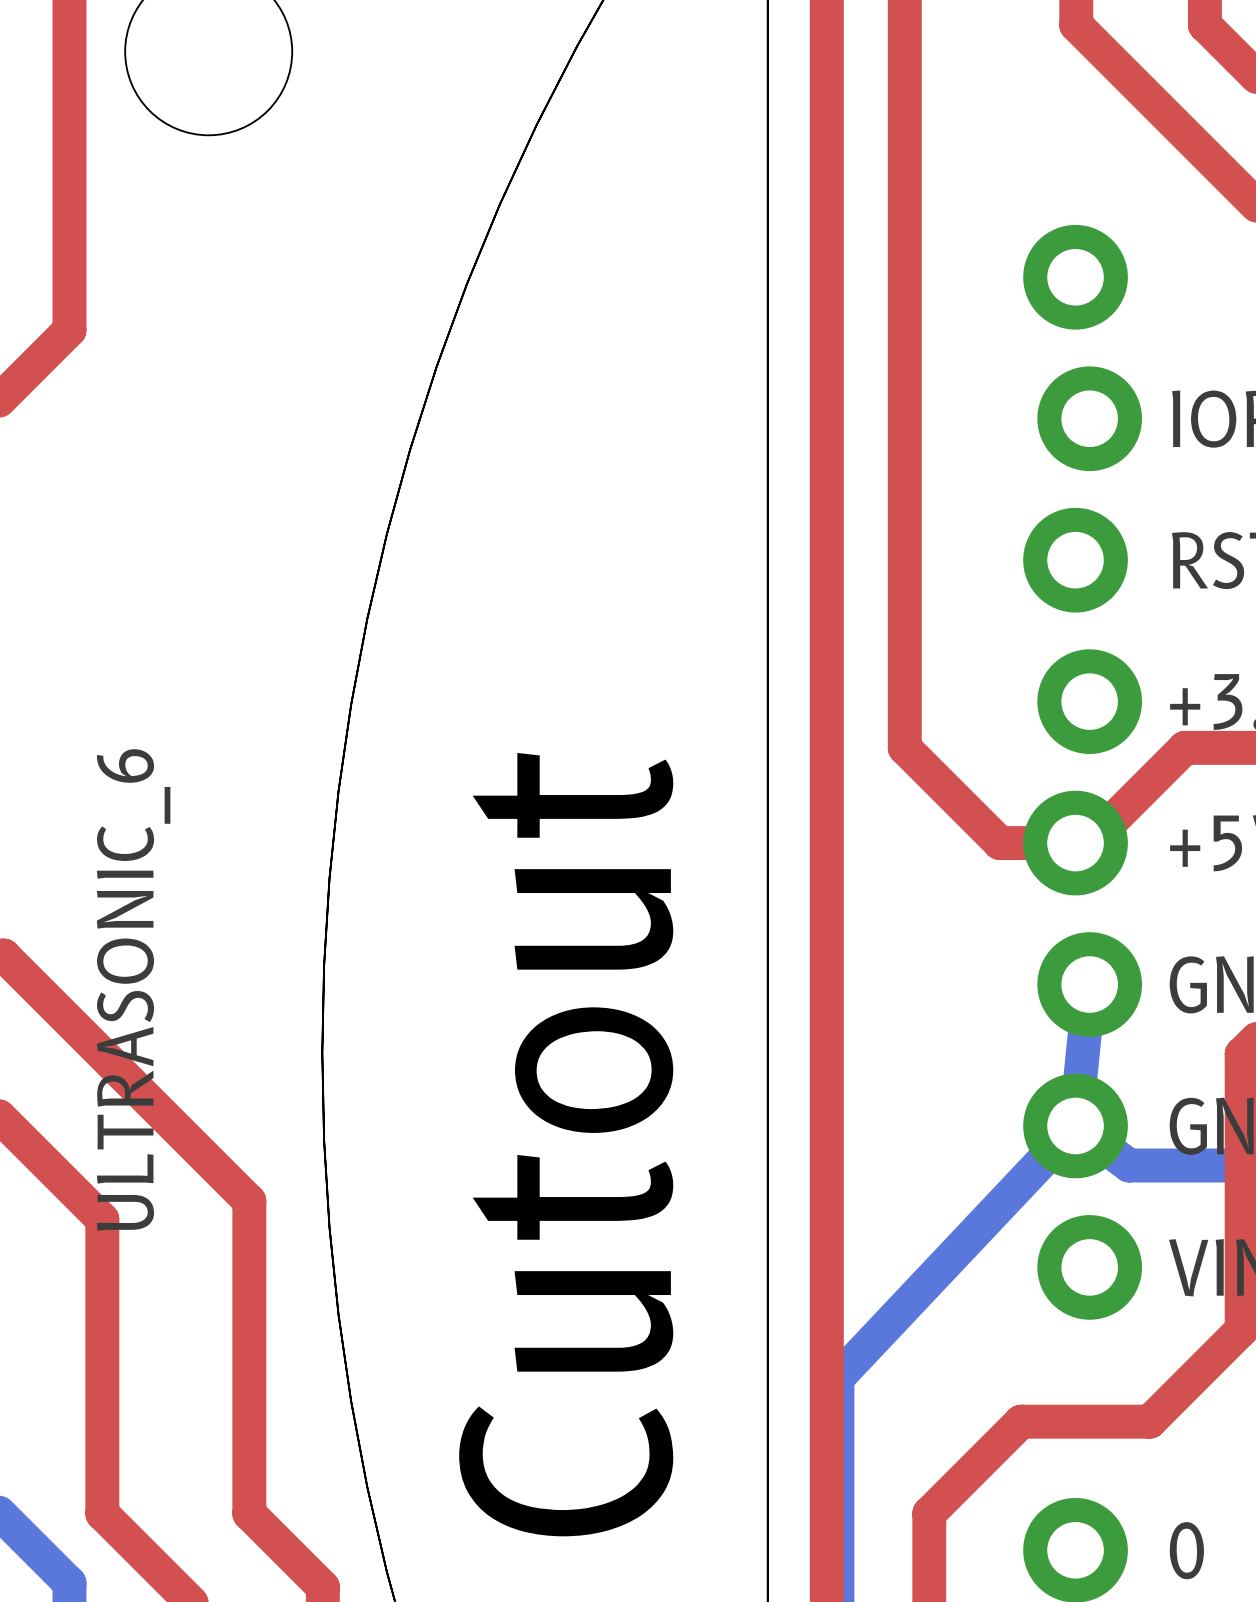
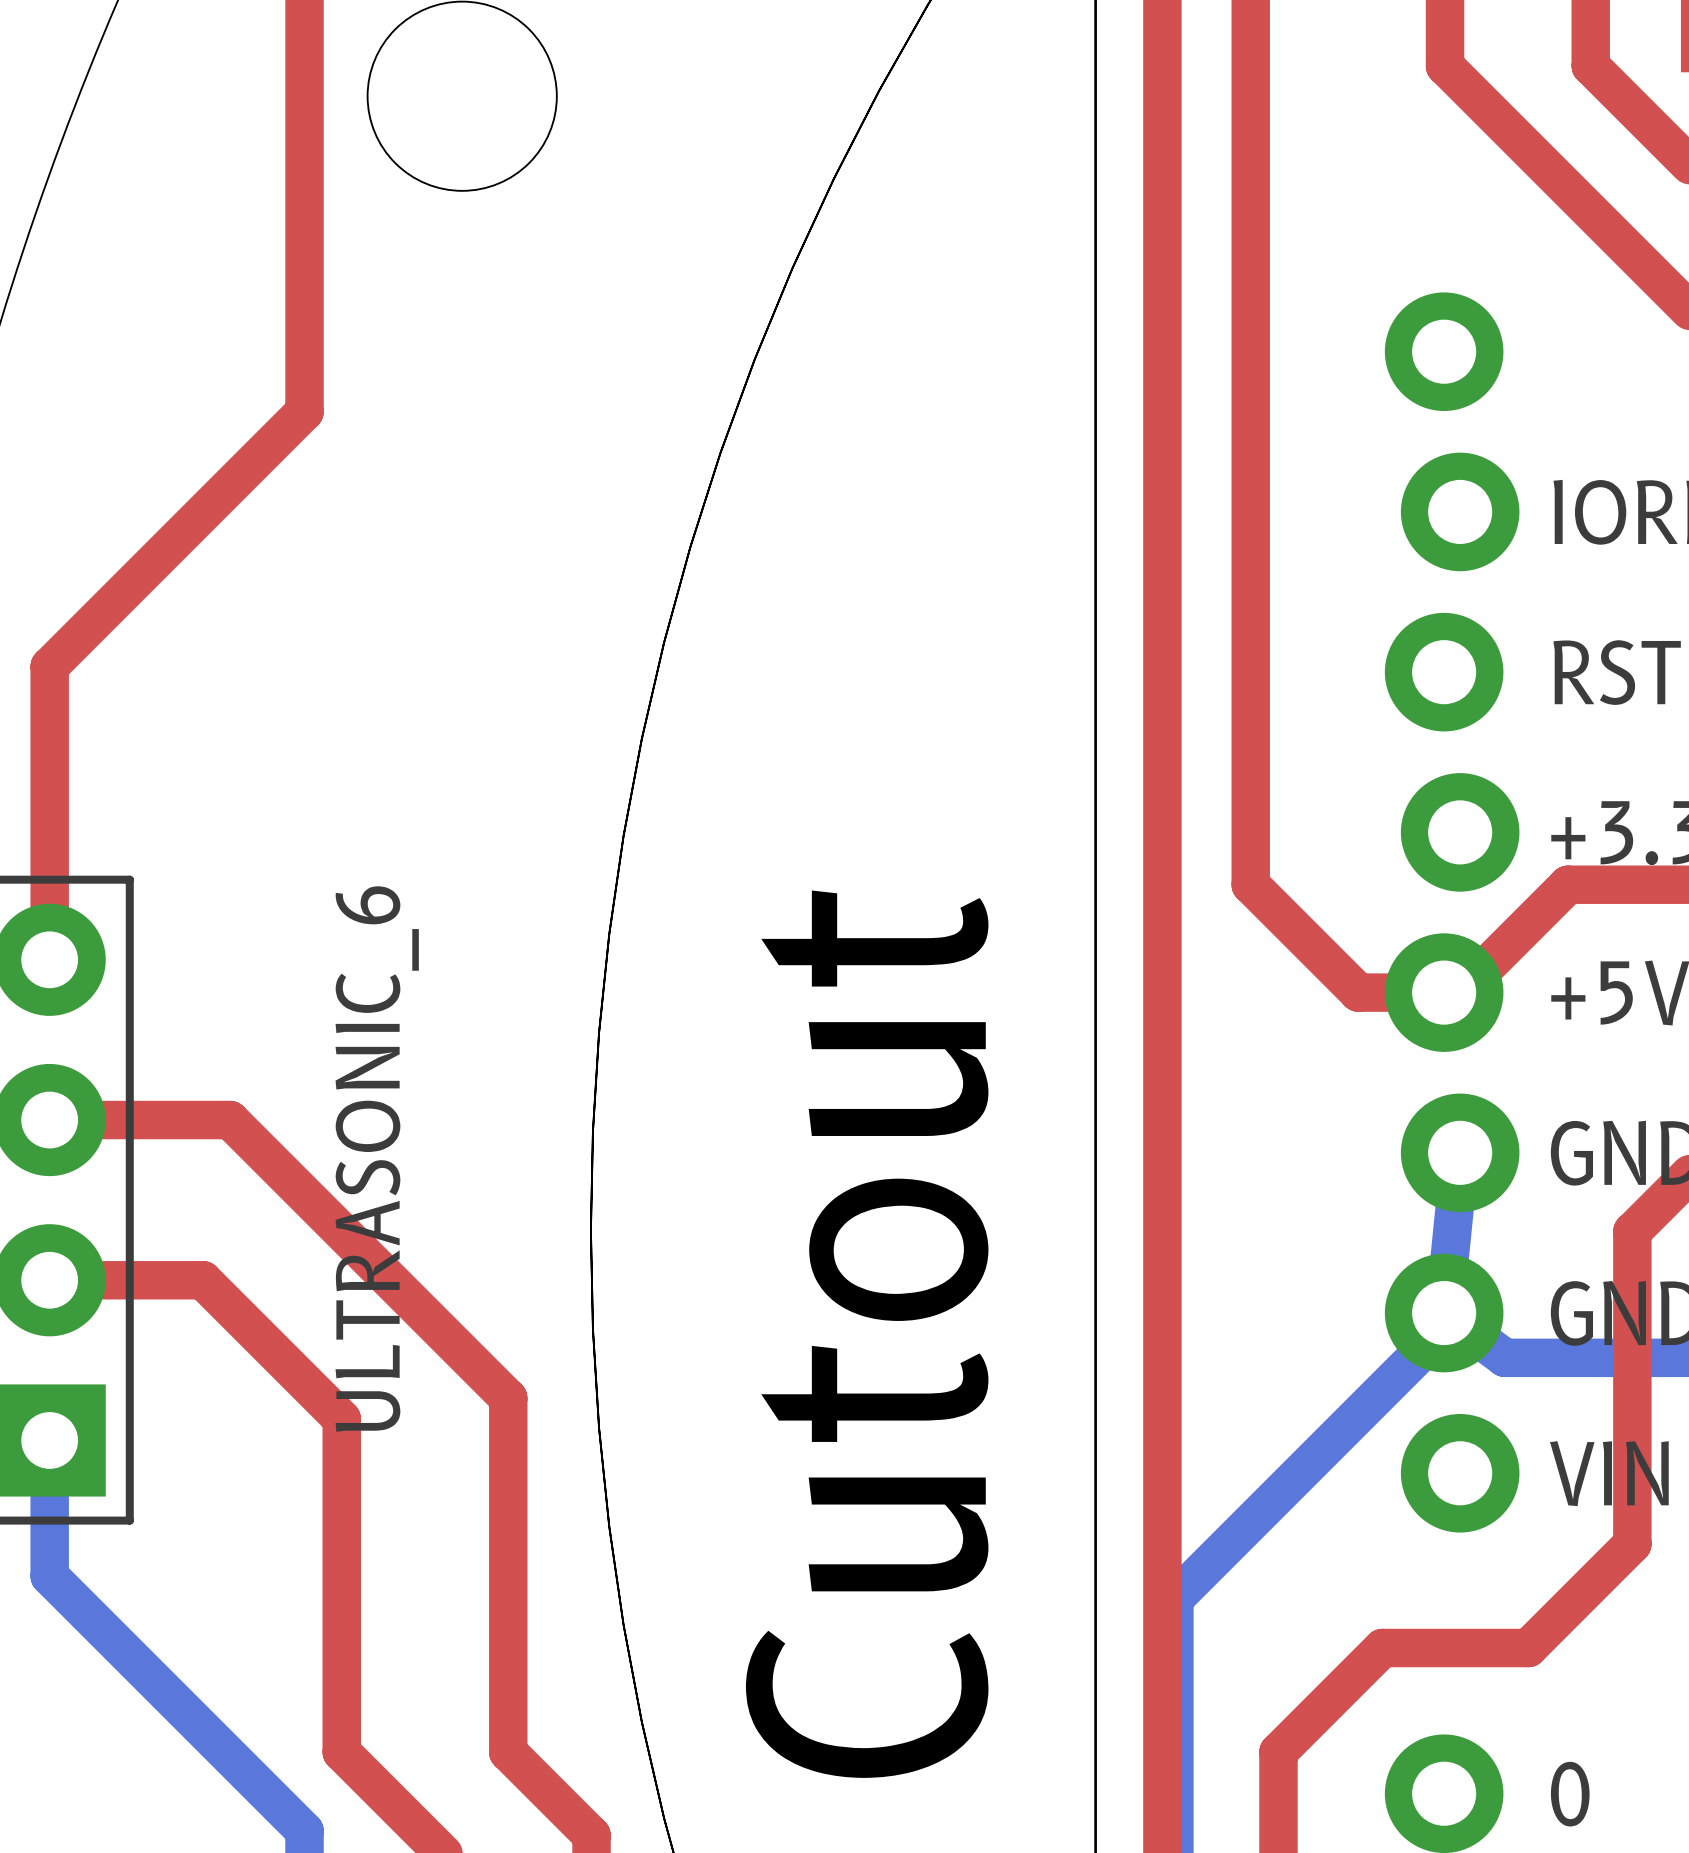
bottom track: (1075, 1125) (837, 1378) -> (1460, 1313) (1174, 1598)

